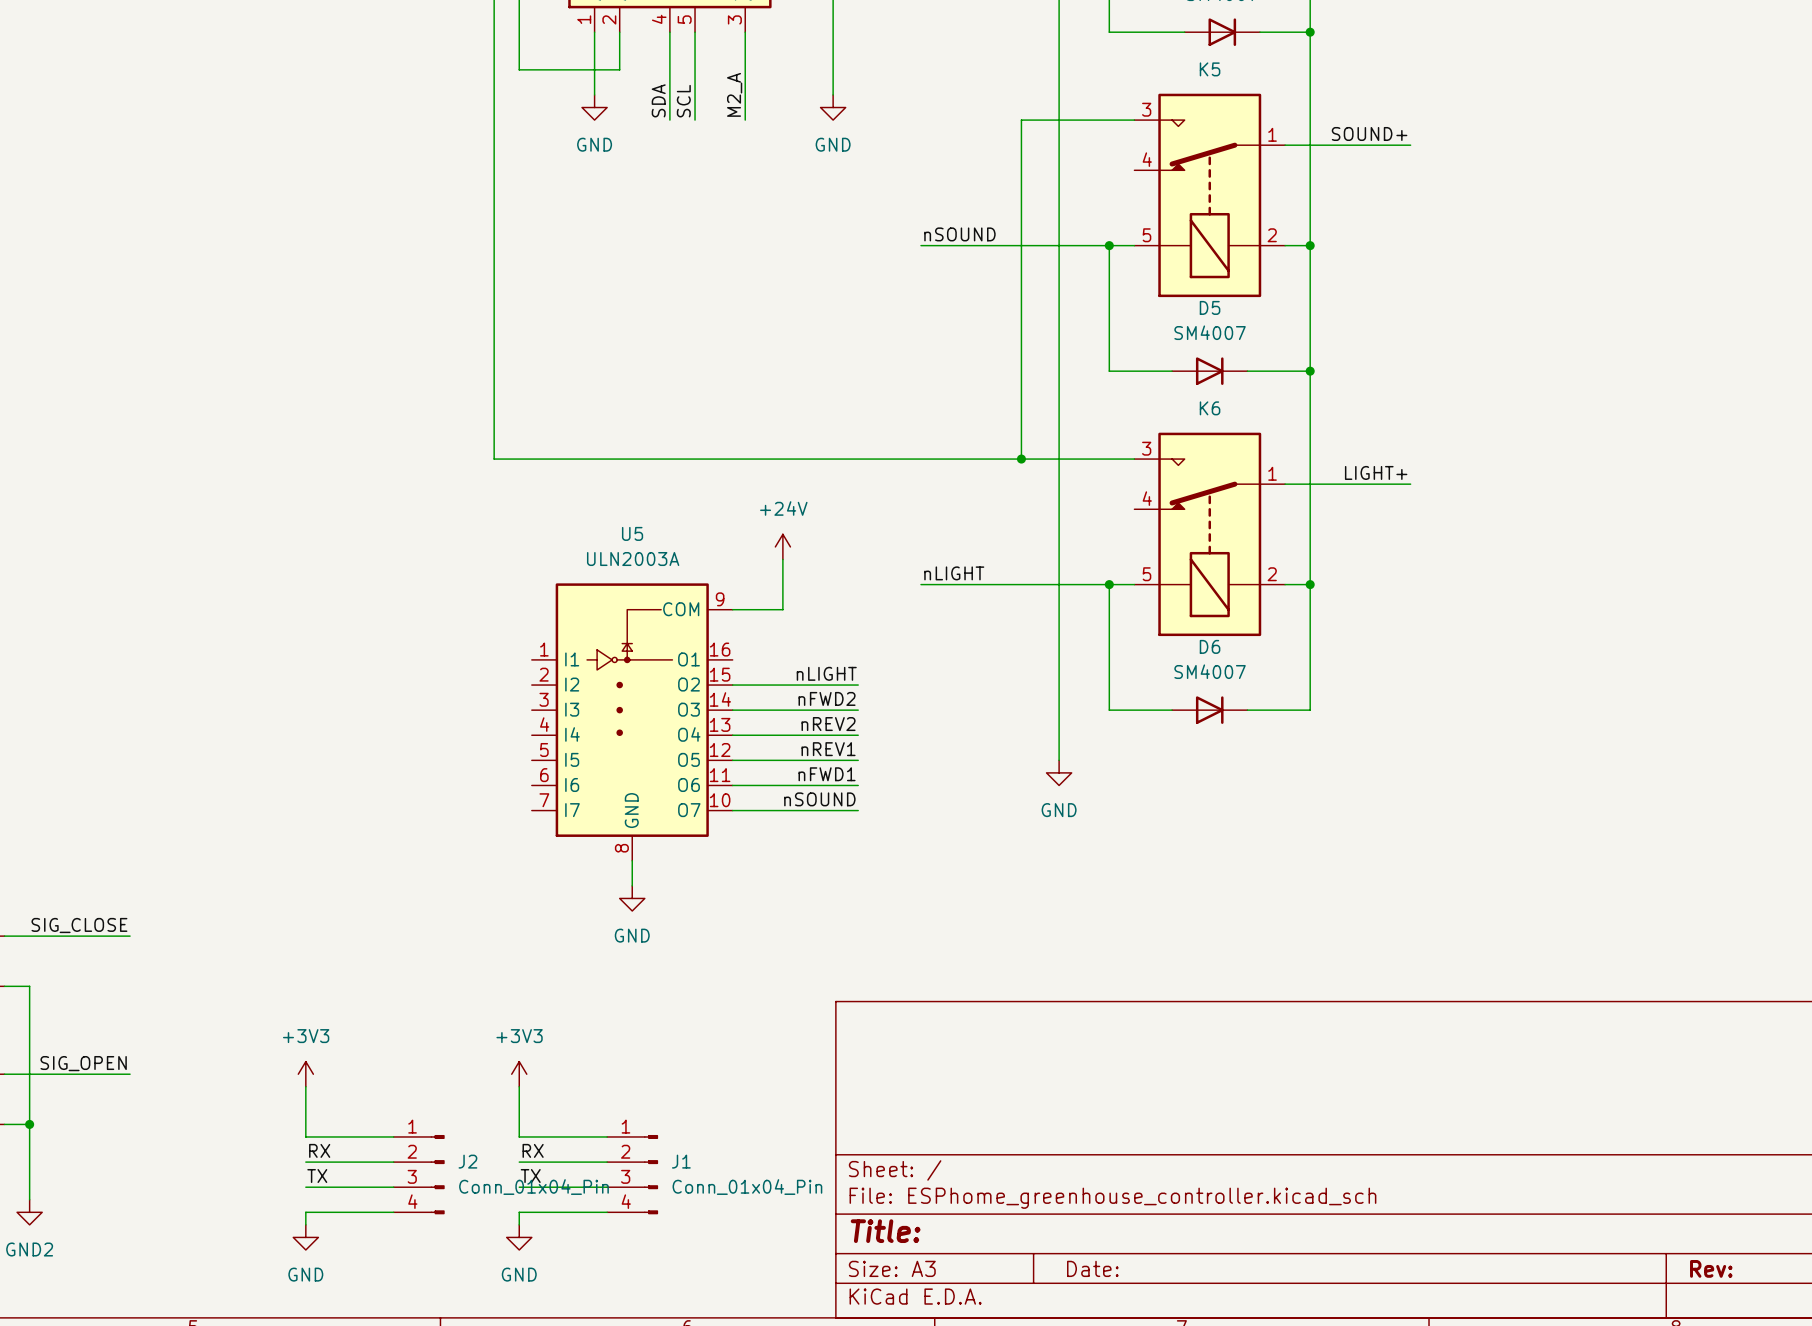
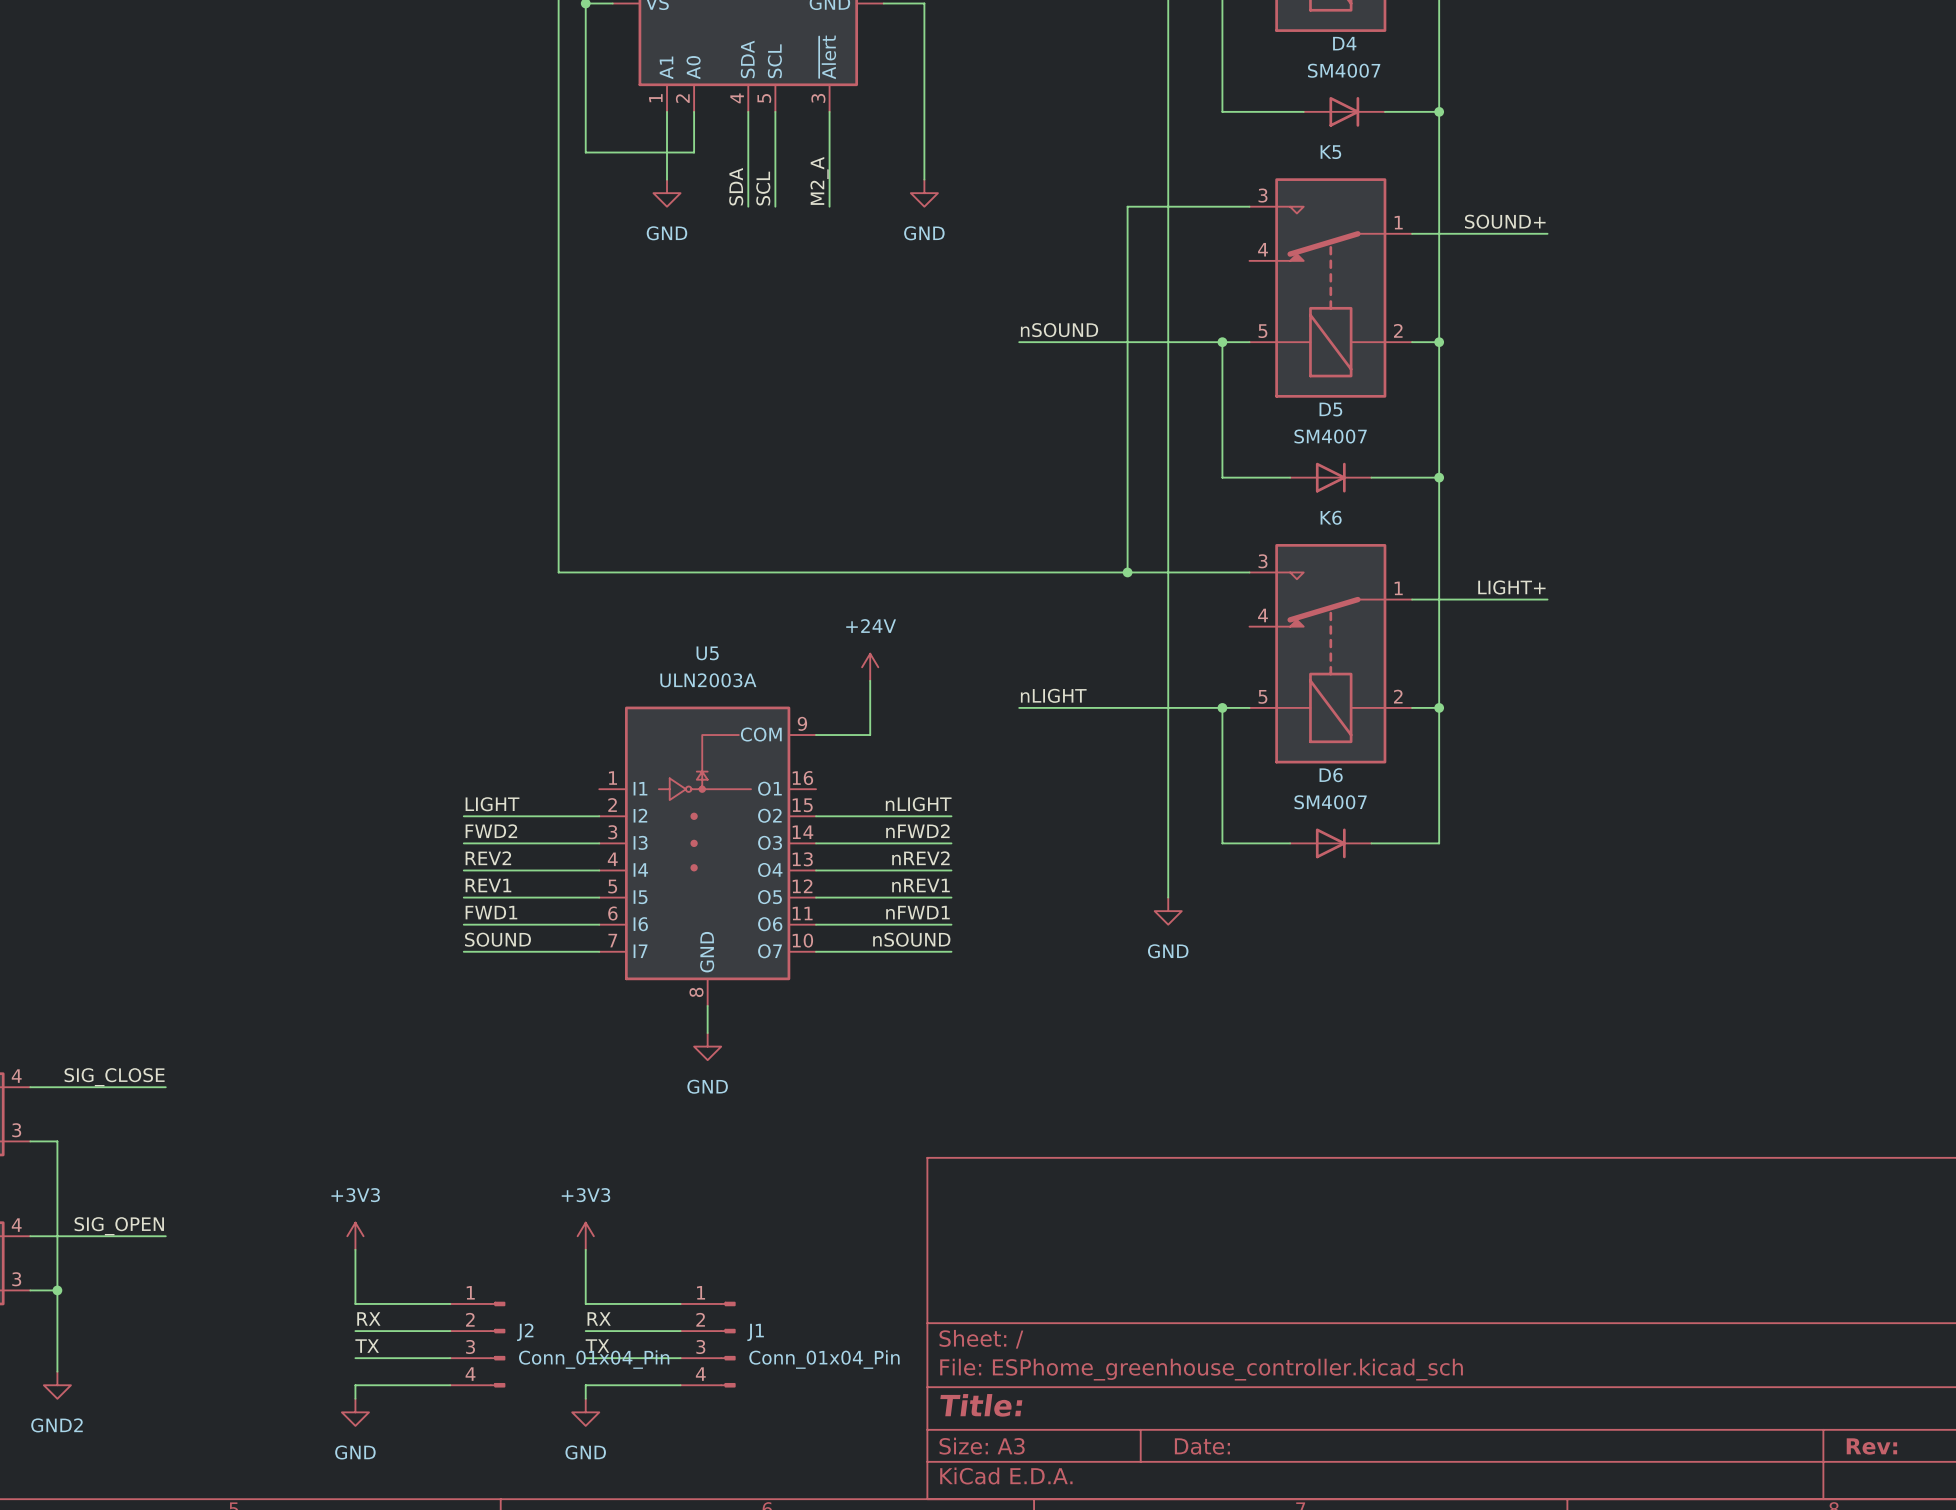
label: none -> LIGHT (492, 804)
wire: none -> (463, 816) (599, 816)
label: none -> FWD2 (491, 831)
wire: none -> (463, 843) (599, 843)
label: none -> REV2 (488, 858)
wire: none -> (463, 870) (599, 870)
label: none -> REV1 (488, 885)
wire: none -> (463, 897) (599, 897)
label: none -> FWD1 (491, 912)
wire: none -> (463, 924) (599, 924)
label: none -> SOUND (497, 939)
wire: none -> (463, 951) (599, 951)

